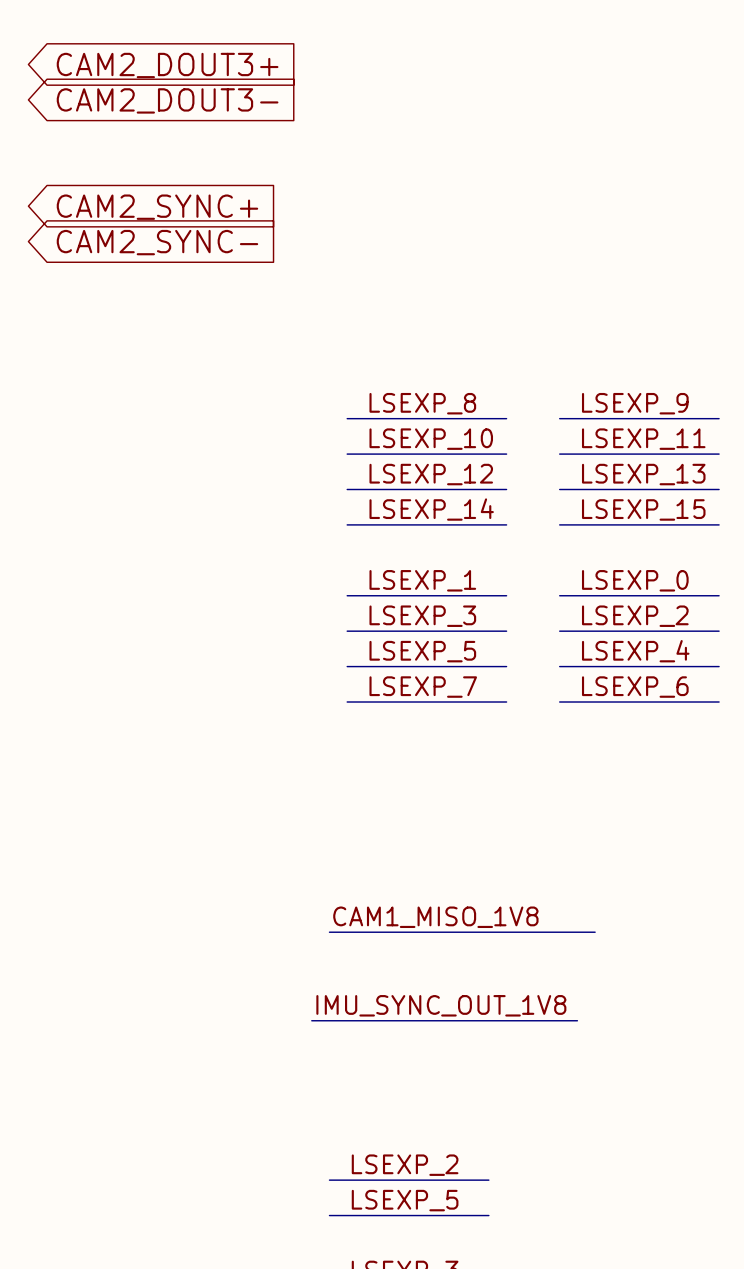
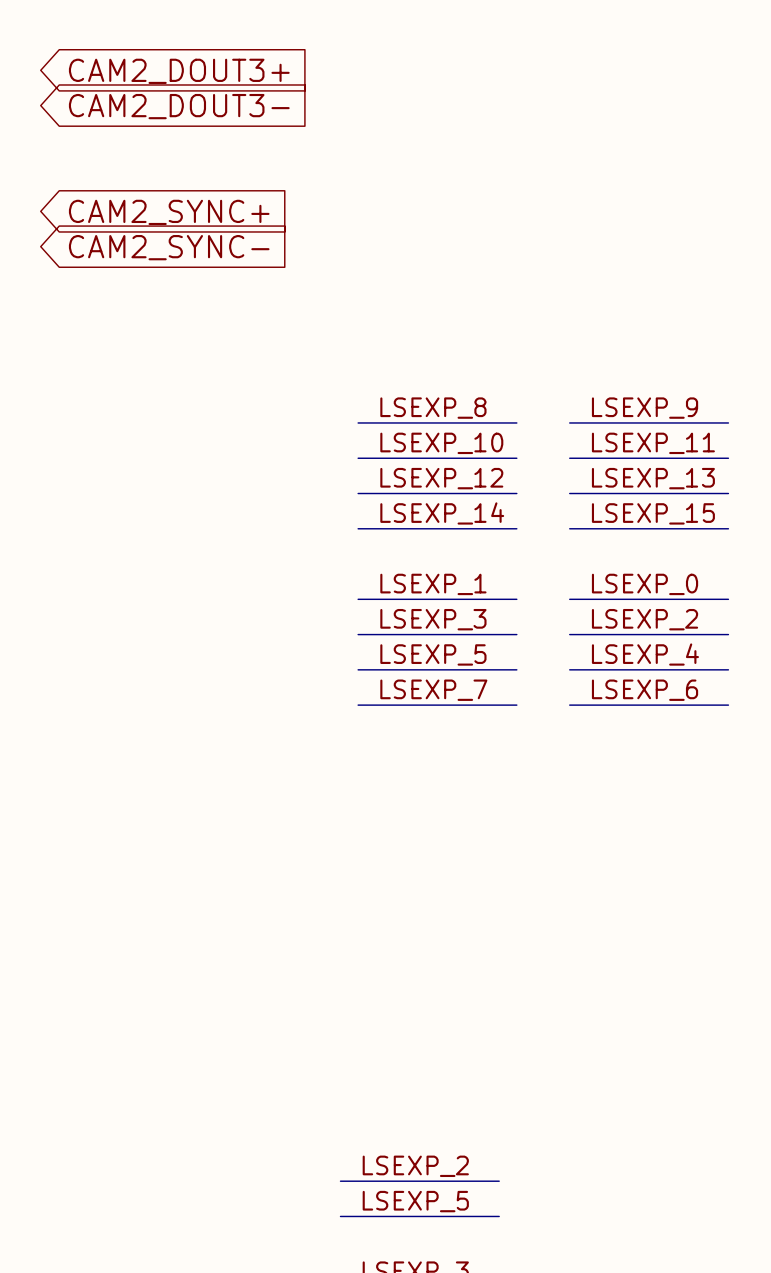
label: CAM1_MISO_1V8 (435, 917) -> none
wire: (329, 932) (595, 932) -> none
label: IMU_SYNC_OUT_1V8 (441, 1005) -> none
wire: (311, 1020) (577, 1020) -> none

